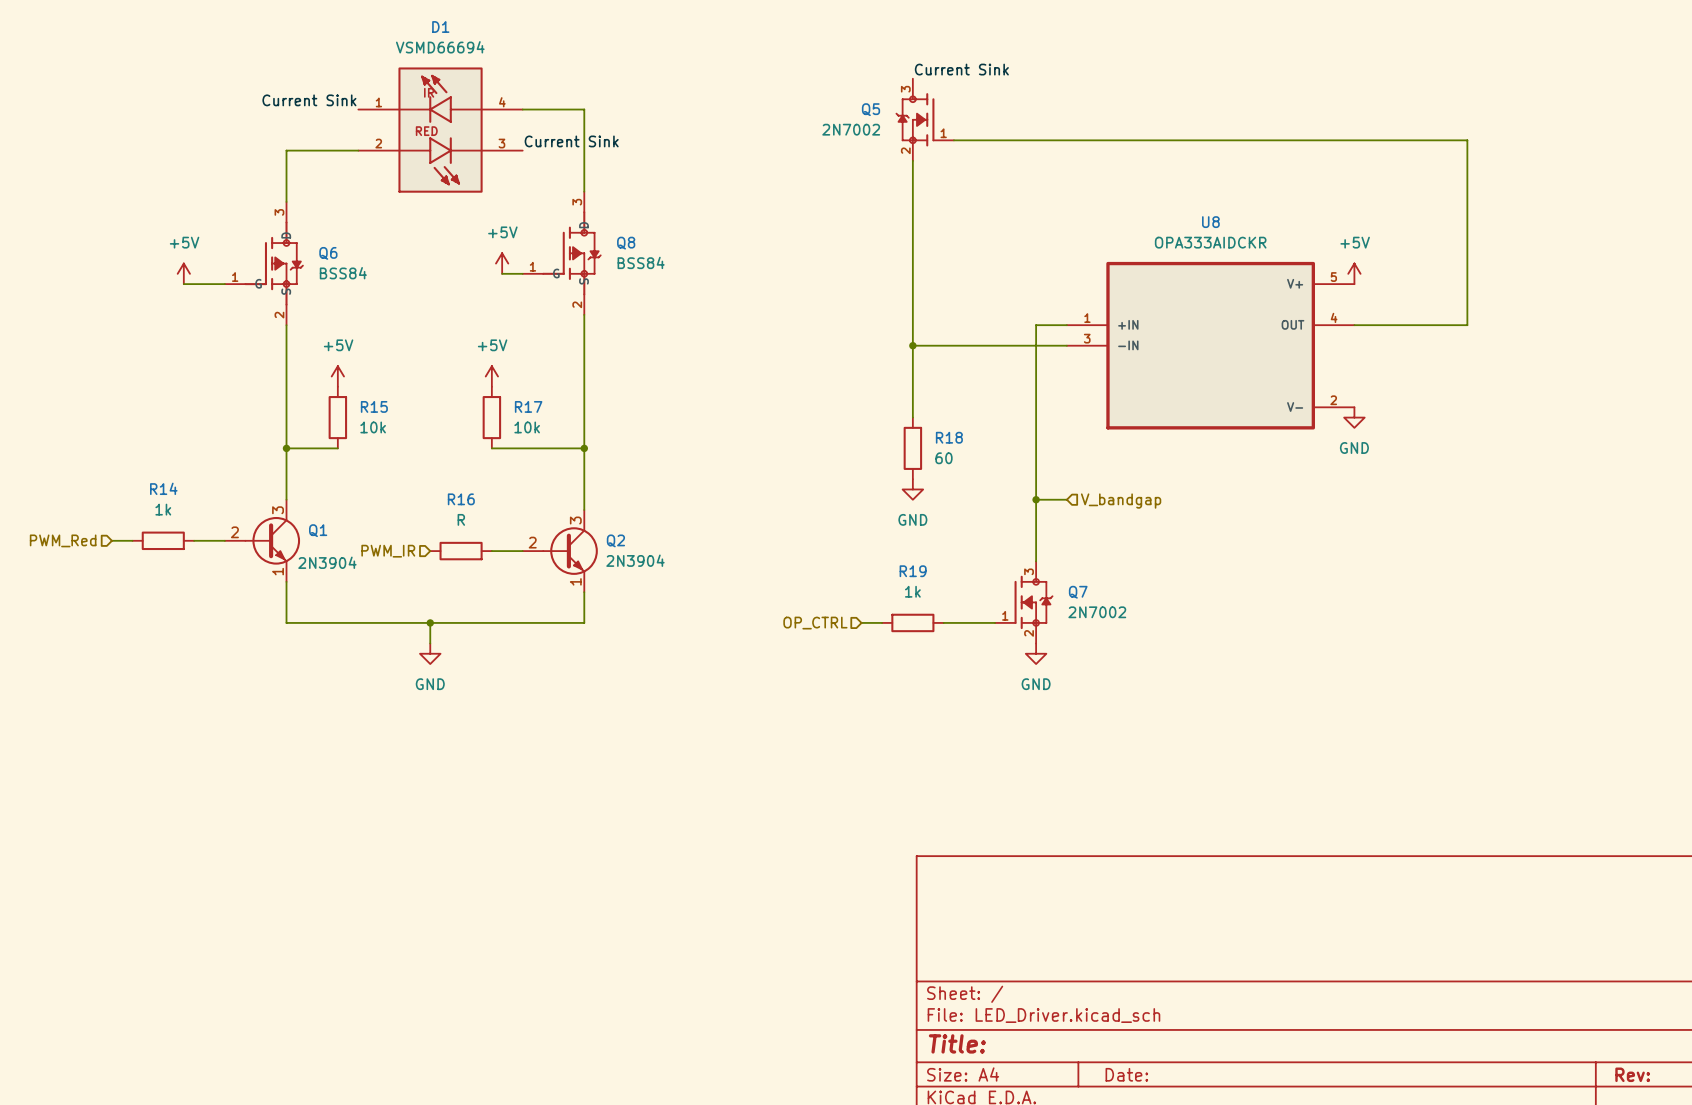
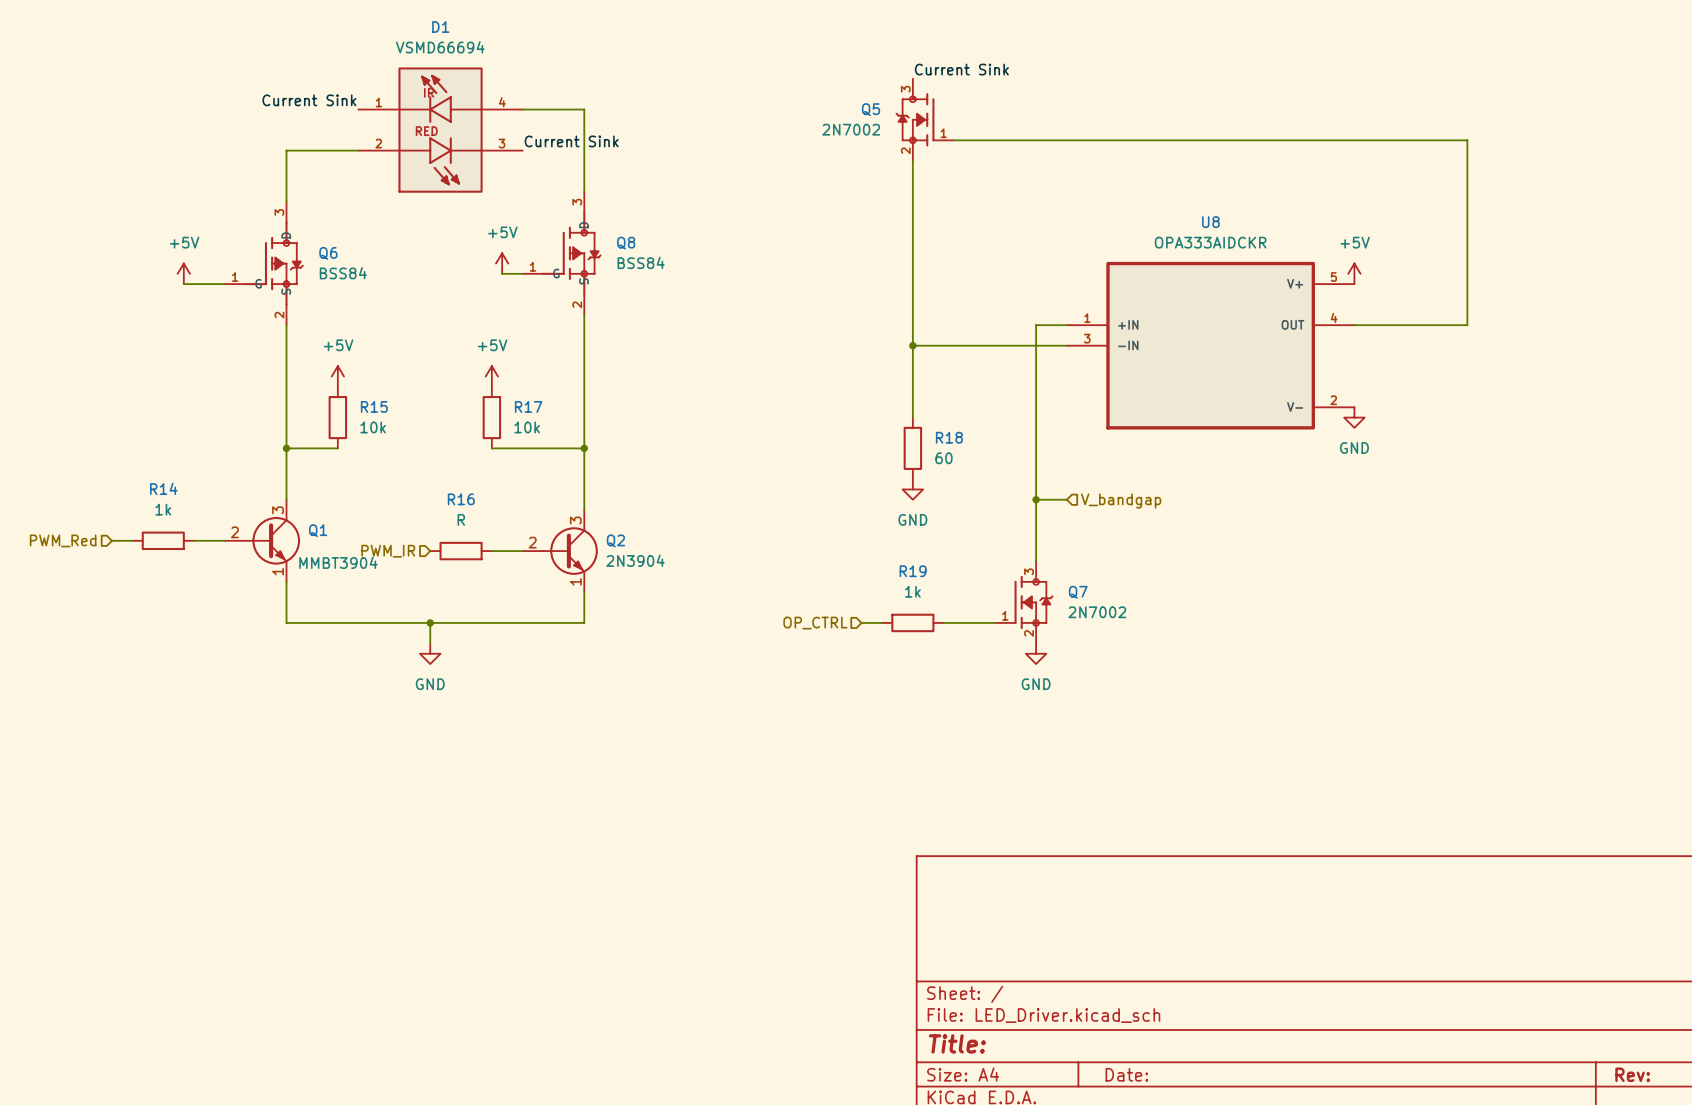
Q1 value: 2N3904 (327, 562) -> MMBT3904 (338, 562)

